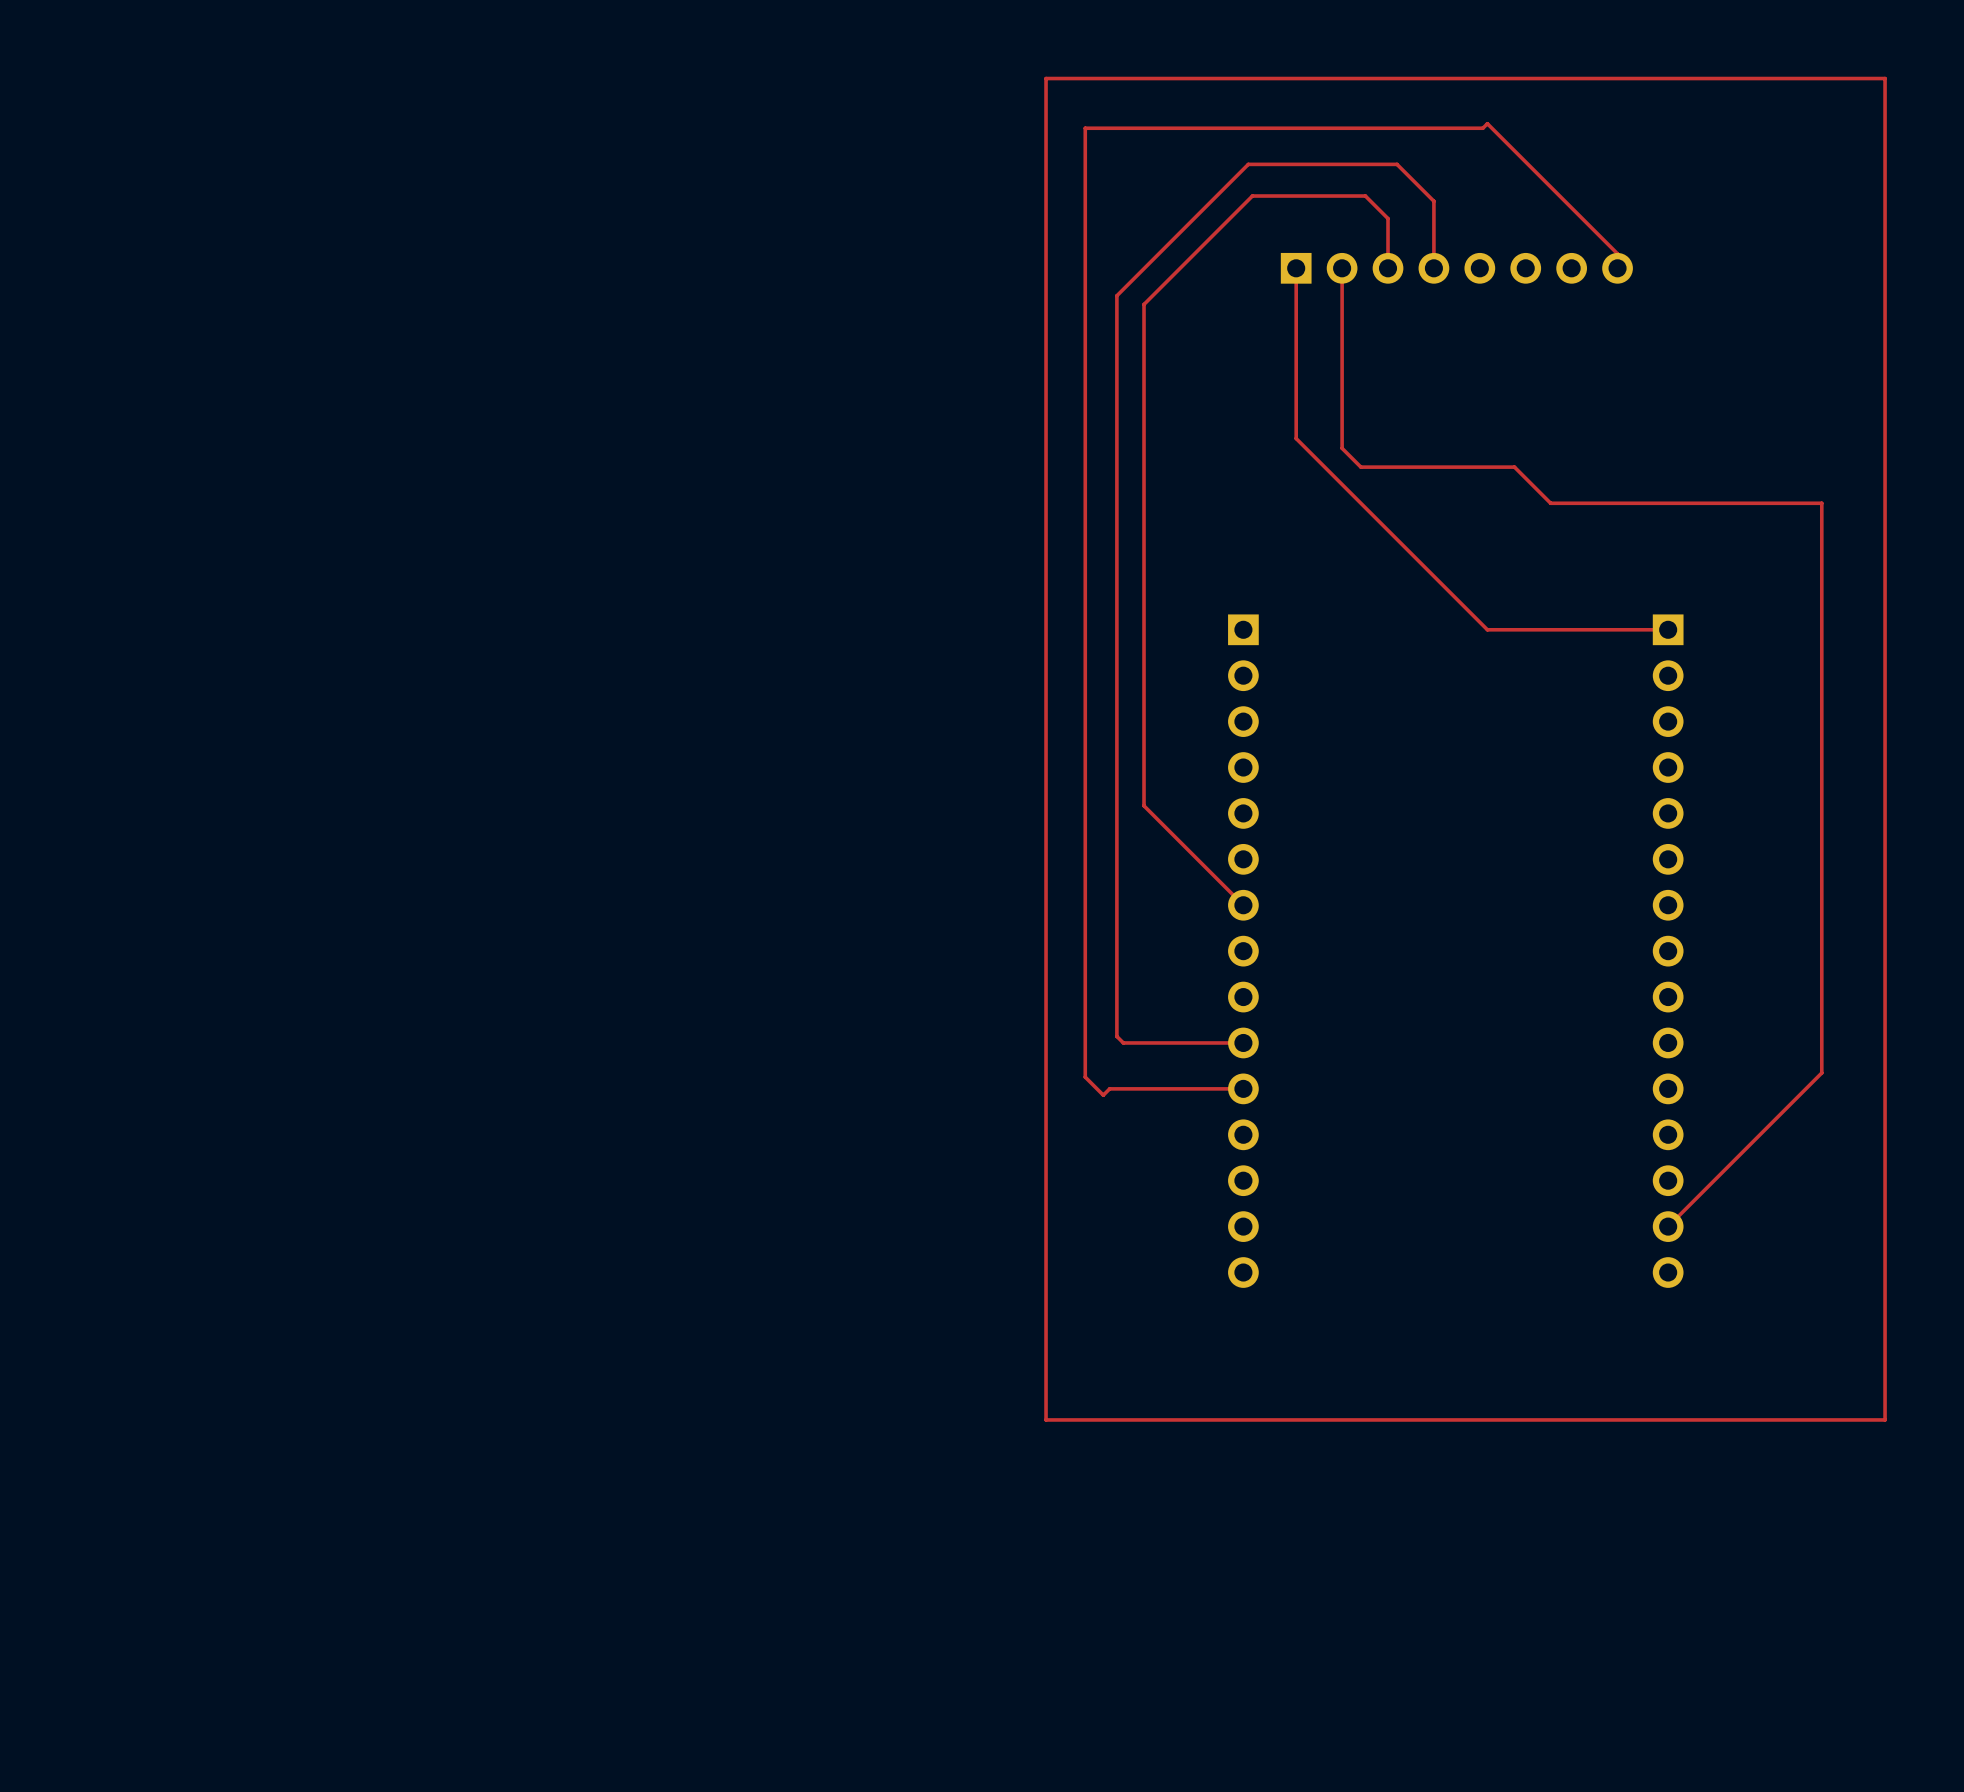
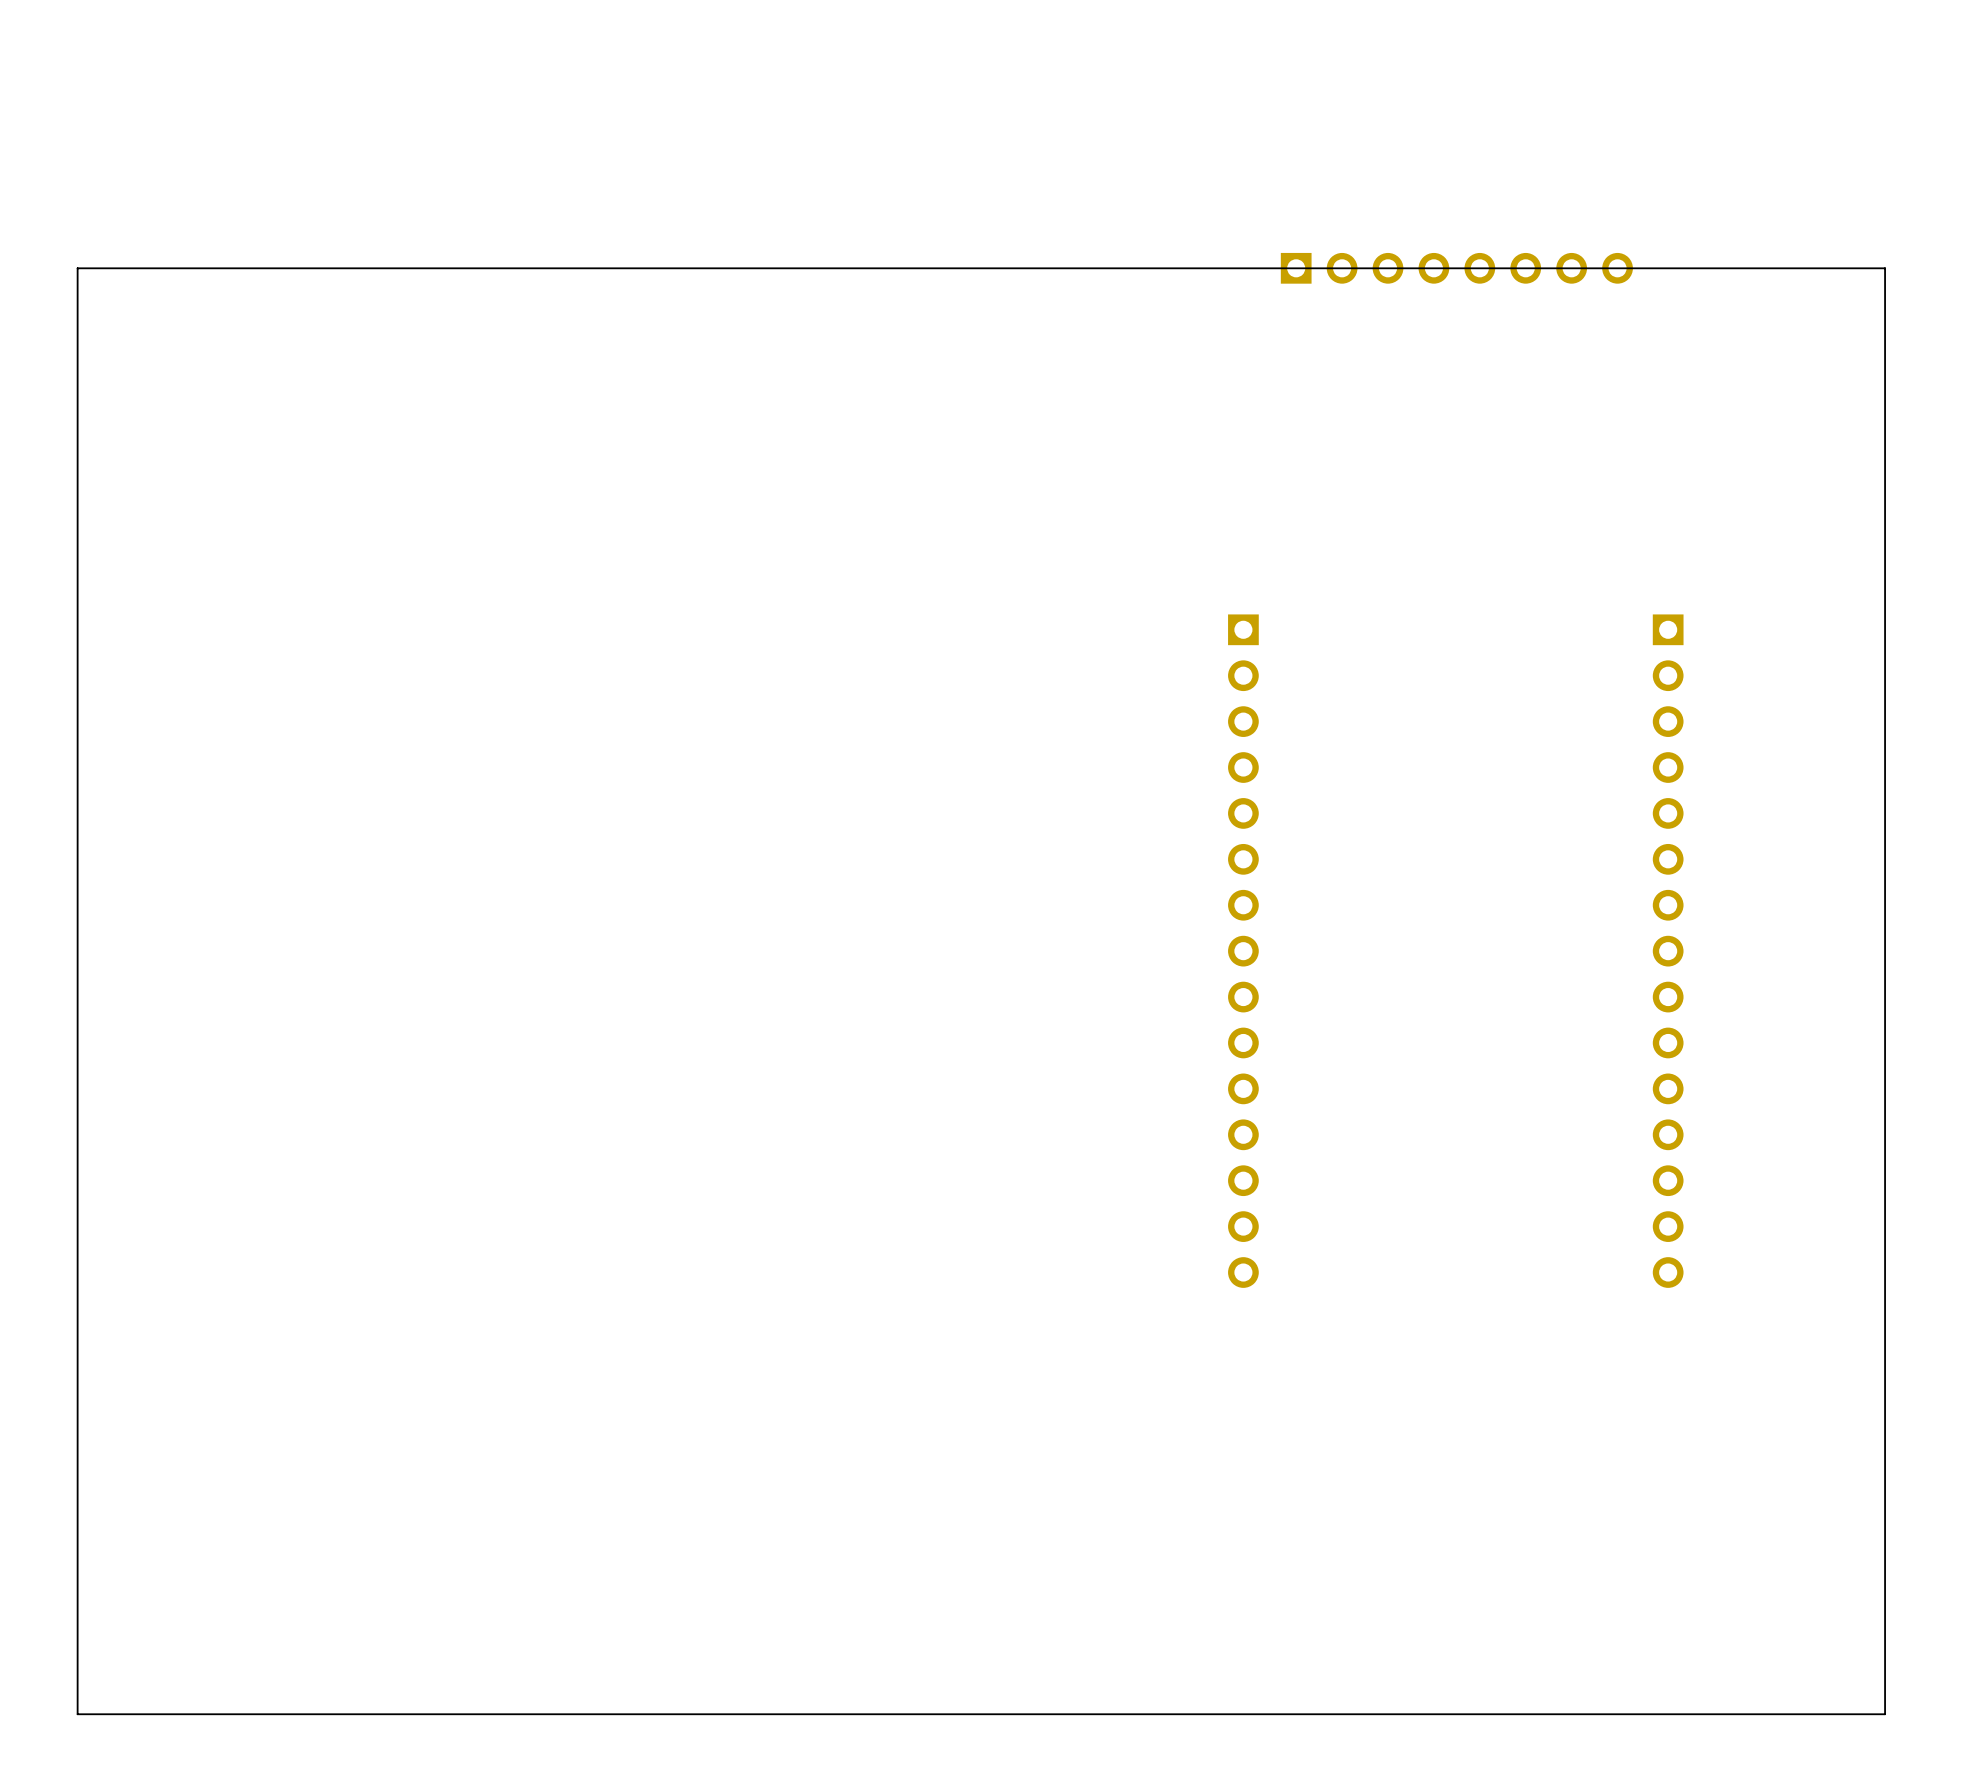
top track: (1885, 78) (1046, 78) (1046, 1419) (1885, 1419) (1885, 78) -> none
top track: (1296, 268) (1296, 438) (1487, 629) (1668, 629) -> none
top track: (1342, 268) (1342, 448) (1360, 467) (1514, 467) (1550, 503) (1821, 503) (1821, 1072) (1668, 1226) -> none
top track: (1388, 268) (1388, 218) (1365, 196) (1252, 196) (1144, 304) (1144, 805) (1243, 905) -> none
top track: (1433, 268) (1433, 201) (1397, 164) (1248, 164) (1116, 295) (1116, 1036) (1123, 1042) (1243, 1042) -> none
top track: (1617, 268) (1617, 253) (1487, 123) (1482, 128) (1085, 128) (1085, 1077) (1103, 1095) (1109, 1088) (1243, 1088) -> none
board edge: none -> (1885, 268) (77, 268) (77, 1714) (1885, 1714) (1885, 268)

